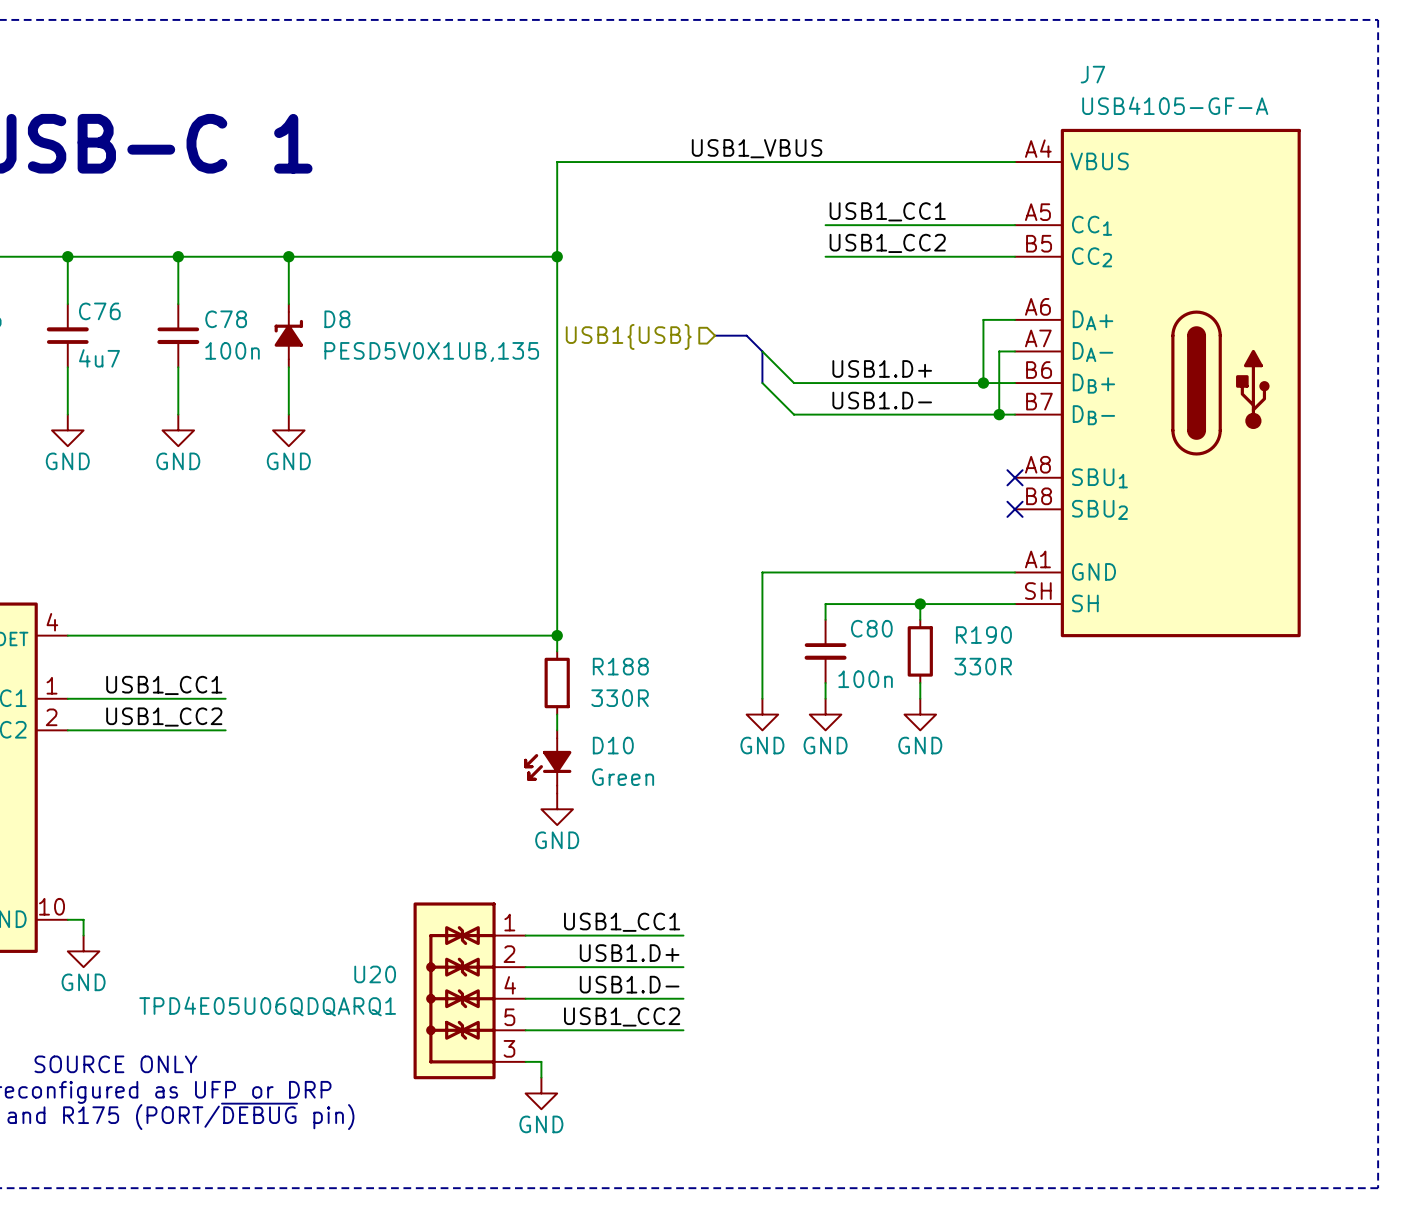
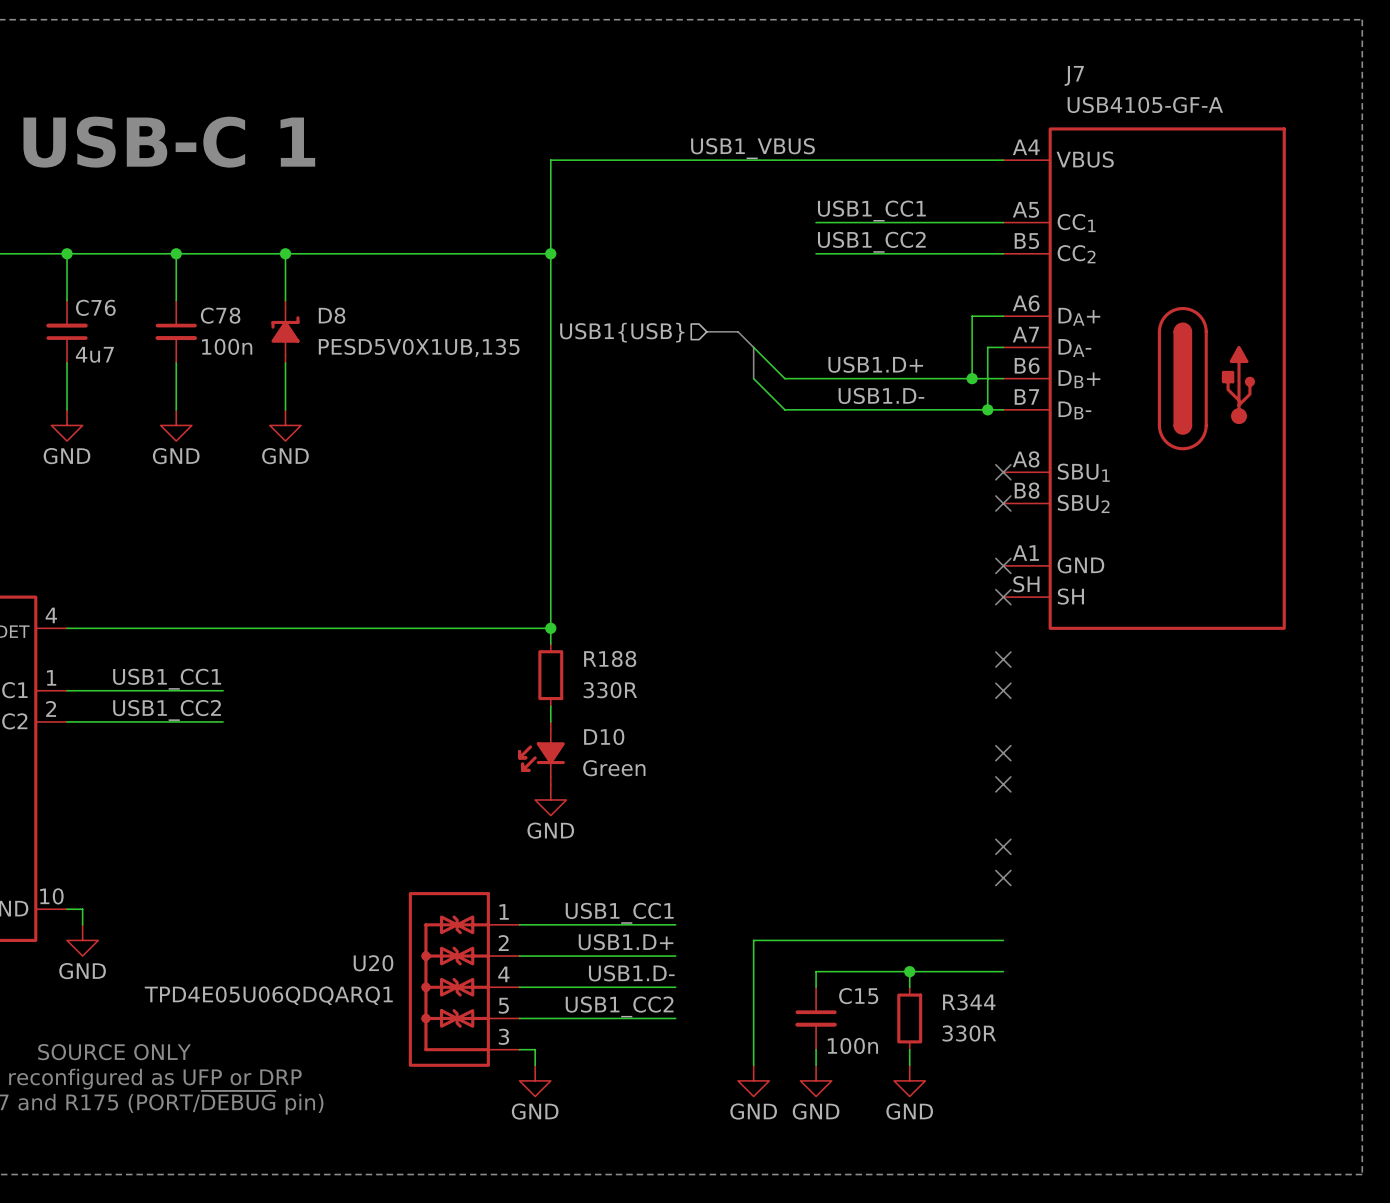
wire: (1015, 572) (762, 572) (762, 698) -> none
no-connect mark: none -> (1003, 565)
wire: (920, 604) (920, 619) -> none
junction: (920, 604) -> none
wire: (1015, 604) (825, 604) (825, 619) -> none
no-connect mark: none -> (1003, 597)
C80: (825, 651) -> none
R190: (920, 651) -> none
no-connect mark: none -> (1003, 659)
wire: (825, 682) (825, 698) -> none
wire: (920, 682) (920, 698) -> (909, 971) (909, 987)
no-connect mark: none -> (1003, 690)
power symbol: GND (762, 714) -> none
power symbol: GND (825, 714) -> none
power symbol: GND (920, 714) -> none
no-connect mark: none -> (1003, 753)
no-connect mark: none -> (1003, 784)
no-connect mark: none -> (1003, 846)
no-connect mark: none -> (1003, 878)
wire: none -> (1003, 940) (753, 940) (753, 1065)
junction: none -> (909, 971)
wire: none -> (1003, 971) (816, 971) (816, 987)
C15: none -> (816, 1018)
R344: none -> (909, 1018)
wire: none -> (816, 1049) (816, 1065)
wire: none -> (909, 1049) (909, 1065)
power symbol: none -> GND (753, 1080)
power symbol: none -> GND (816, 1080)
power symbol: none -> GND (909, 1080)

